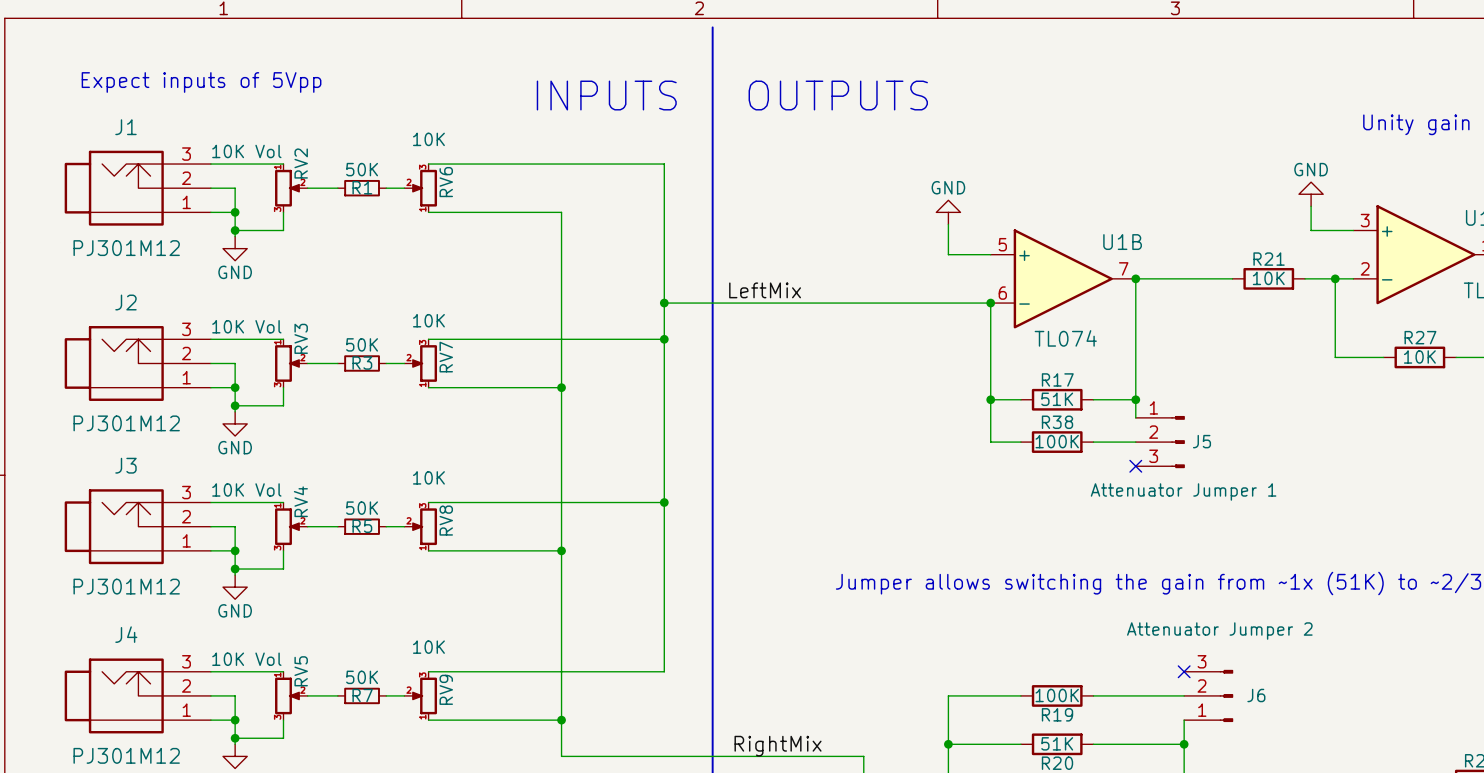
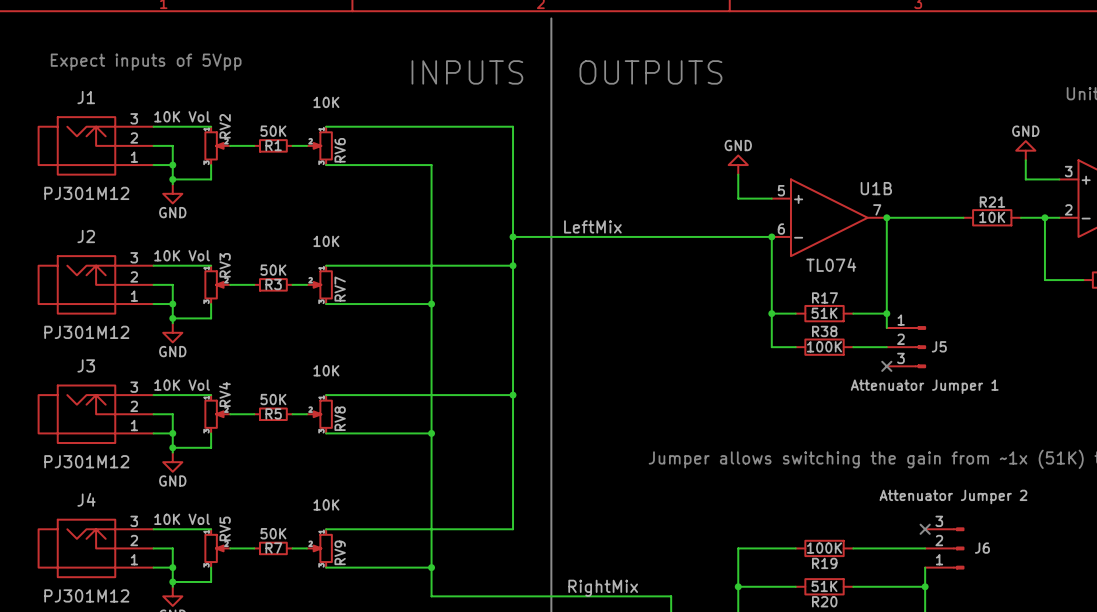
RV6 flip: as is (424, 188) -> up-down (323, 145)
RV7 flip: as is (424, 363) -> up-down (323, 284)
RV8 flip: as is (424, 526) -> up-down (323, 414)
RV9 flip: as is (424, 695) -> up-down (323, 548)

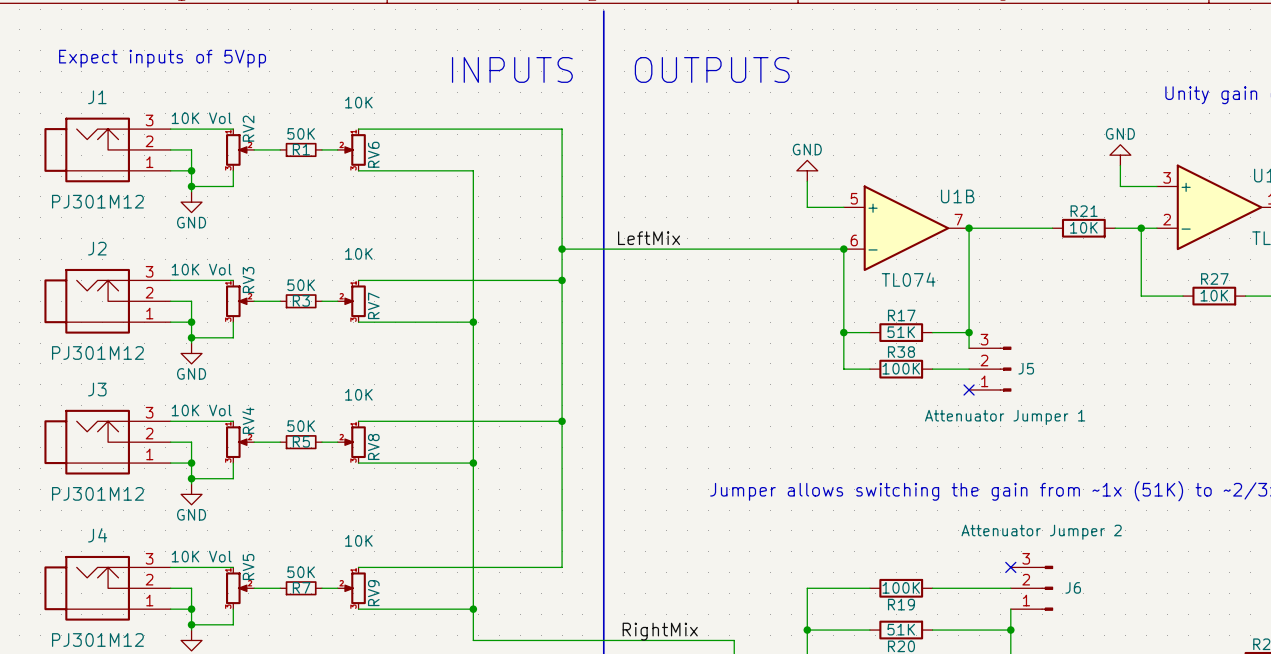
J5 flip: as is (920, 347) -> up-down (1005, 369)

